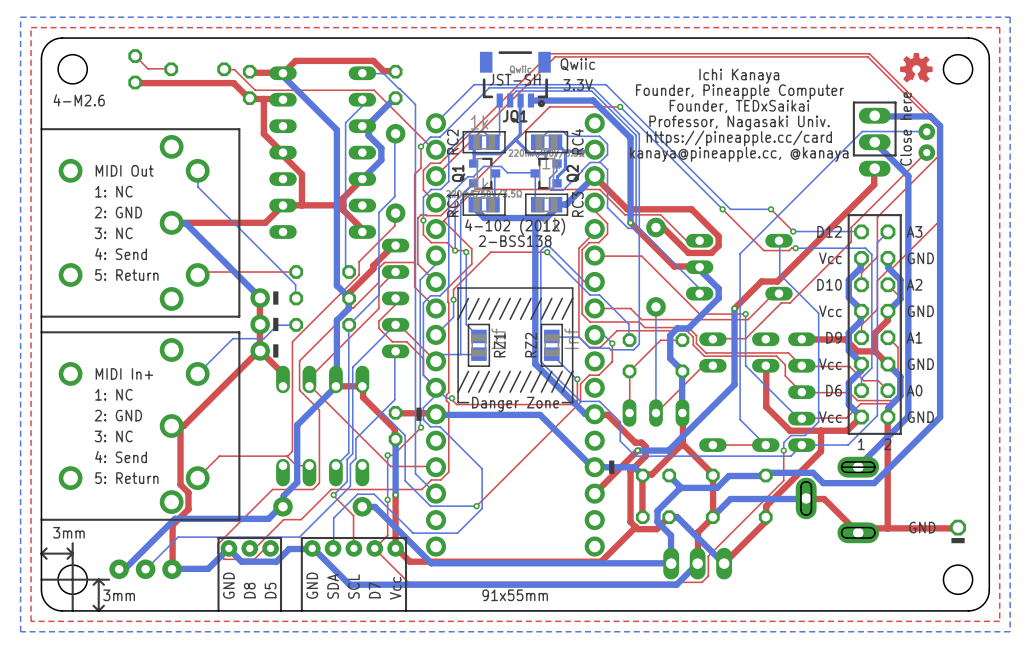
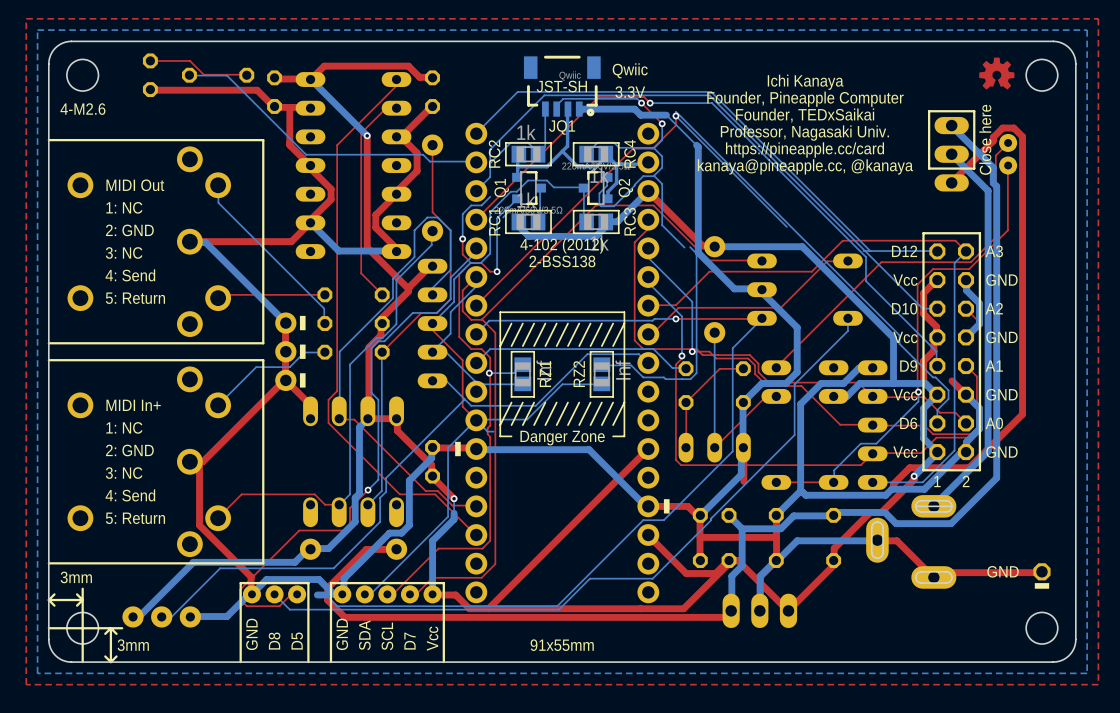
bottom zone outline: (1010, 17) (20, 17) (20, 631) (1010, 631) (1010, 17) -> (1087, 30) (1087, 673) (37, 673) (37, 30) (1087, 30)
top zone outline: (999, 27) (31, 27) (31, 621) (999, 621) (999, 27) -> (1098, 18) (1098, 684) (26, 684) (26, 18) (1098, 18)
top track: (135, 56) (147, 68) (171, 69) -> (150, 60) (190, 60) (203, 74) (246, 75)
bottom track: none -> (189, 75) (227, 75) (306, 154) (423, 154) (429, 161) (476, 162)
top track: (224, 69) (234, 69) (255, 90) (374, 90) (432, 148) (436, 149) -> none
bottom track: (283, 73) (283, 76) (336, 129) (336, 285) (349, 298) (348, 308) (336, 320) (335, 386) -> (311, 79) (367, 135)
bottom track: (362, 73) (383, 73) (415, 104) (415, 257) -> (490, 253) (480, 263) (470, 263) (454, 279)
bottom track: (605, 84) (730, 209) (771, 209) -> (660, 91) (711, 91) (870, 251)
bottom track: (498, 87) (489, 87) (440, 137) (430, 137) (421, 146) -> (544, 95) (490, 149) (490, 163)
bottom track: (593, 87) (611, 106) -> (634, 109) (640, 115) (666, 115)
bottom track: none -> (646, 95) (709, 95) (922, 308) (937, 308)
bottom track: (584, 91) (591, 91) (636, 135) (636, 225) (632, 228) (628, 228) -> (637, 98) (641, 103)
top track: none -> (641, 103) (662, 123)
via: none -> (641, 103)
bottom track: none -> (650, 103) (712, 103) (866, 257) (866, 281) (936, 351) (937, 366)
via: none -> (650, 103)
top track: none -> (432, 106) (401, 136) (396, 136) (403, 139) (417, 152) (417, 171) (397, 190) (396, 194)
bottom track: (395, 98) (367, 125) (362, 126) (368, 128) (368, 135) (381, 148) (381, 160) (362, 179) -> none
top track: none -> (396, 108) (386, 108) (361, 133) (361, 273) (382, 294)
bottom track: (362, 99) (362, 106) (345, 122) (345, 268) (349, 271) -> none
bottom track: (582, 100) (593, 100) (630, 137) (630, 222) -> none
top track: (620, 106) (549, 106) (440, 215) (421, 214) (417, 218) (417, 264) (436, 281) -> (675, 111) (675, 125) (652, 148) (632, 148) (476, 305)
bottom track: none -> (662, 123) (662, 140) (654, 148)
via: none -> (662, 123)
bottom track: (875, 116) (930, 116) (940, 125) (940, 417) (916, 441) -> (952, 126) (993, 167) (993, 183) (996, 186) (996, 478)
top track: none -> (367, 135) (367, 247) (408, 289)
via: none -> (367, 135)
bottom track: (926, 131) (862, 131) (740, 253) (740, 419) (765, 445) -> (918, 392) (918, 401) (876, 443) (860, 443) (834, 470) (833, 482)
top track: none -> (432, 145) (432, 212) (450, 230) (450, 299) (436, 312) (421, 312) (382, 352)
bottom track: (395, 133) (394, 196) (390, 200) -> (432, 294) (432, 288) (450, 269) (450, 230) (437, 217) (427, 217)
bottom track: (639, 133) (639, 228) (699, 288) (699, 293) -> (696, 145) (698, 146) (698, 252) (734, 288) (761, 288) (763, 294)
top track: (421, 146) (421, 168) (414, 174) (414, 287) (436, 308) -> none
via: (421, 146) -> none
top track: (926, 152) (851, 227) (851, 241) (790, 302) (781, 302) (745, 338) (713, 338) -> (1008, 142) (995, 155) (995, 237) (970, 262) (881, 262) (776, 367)
top track: none -> (1008, 165) (1007, 230) (969, 269) (933, 269) (917, 284) (918, 392)
bottom track: (448, 163) (448, 181) -> (490, 177) (476, 190)
top track: (874, 168) (874, 184) (777, 281) (761, 281) (734, 308) -> (951, 182) (993, 140) (993, 137) (1002, 128) (1013, 128) (1022, 136) (1022, 414) (969, 467) (909, 467) (893, 484)
top track: (436, 175) (555, 56) (867, 56) (937, 126) (937, 156) (877, 217) (877, 256) (861, 272) (861, 284) -> none
top track: (301, 183) (301, 205) -> (331, 199) (311, 219) (311, 222)
top track: (546, 189) (474, 189) (436, 229) -> (595, 205) (515, 286)
bottom track: (460, 200) (460, 354) -> none
top track: (436, 202) (423, 190) (423, 170) (430, 163) (440, 163) (549, 53) (869, 53) (940, 125) (940, 219) (877, 280) (877, 309) (861, 325) (861, 337) -> (476, 219) (598, 97) (644, 97) (650, 103)
top track: (594, 202) (594, 210) (607, 223) (607, 233) (598, 242) (589, 242) (582, 249) -> (648, 219) (647, 229) (634, 242) (634, 270)
bottom track: none -> (310, 222) (338, 251) (396, 251)
top track: (343, 205) (283, 205) -> none
top track: (627, 209) (691, 209) (718, 236) (718, 245) (711, 252) (688, 252) (663, 227) (655, 227) -> (683, 226) (702, 245) (714, 246)
top track: (722, 209) (763, 250) (789, 250) (795, 248) -> none
via: (722, 209) -> none
top track: (771, 209) (793, 231) -> none
via: (771, 209) -> none
top track: (395, 213) (394, 225) (359, 261) (359, 275) (292, 341) (292, 451) (287, 456) -> none
bottom track: none -> (432, 231) (431, 245) (396, 280) (396, 324) (382, 337) (376, 337) (350, 364) (350, 494) (339, 504)
top track: (624, 214) (660, 214) (686, 240) -> (681, 232) (708, 260) (747, 260)
bottom track: (535, 218) (535, 364) (585, 414) (594, 414) -> none
top track: (443, 220) (471, 248) (471, 264) -> none
top track: (630, 222) (674, 266) (699, 267) -> none
via: (630, 222) -> none
bottom track: none -> (714, 246) (802, 246) (893, 337) (893, 383)
bottom track: none -> (476, 248) (475, 252) (450, 277) (450, 299) (436, 312) (412, 312) (384, 341) (378, 341) (371, 348) (371, 392) (378, 399) (378, 479) (368, 490)
top track: (594, 229) (594, 233) (578, 248) (578, 337) (589, 347) (600, 347) (617, 330) (657, 330) -> (692, 351) (709, 351) (716, 358)
bottom track: none -> (648, 248) (648, 257) (692, 301) (692, 351)
via: (793, 231) -> none
top track: none -> (966, 251) (955, 240) (842, 240) (811, 271) (709, 271) (675, 305) (648, 305)
bottom track: (448, 233) (448, 287) (440, 295) (430, 295) (423, 302) (423, 375) (439, 391) (423, 407) (423, 419) (430, 426) (440, 426) (482, 468) (482, 508) (457, 533) (413, 533) (374, 494) (357, 494) (333, 518) (333, 548) -> (601, 383) (562, 384) (527, 419) (476, 419) (448, 447) (448, 516) (370, 594) (365, 594)
bottom track: (378, 237) (378, 295) (349, 324) -> (414, 257) (393, 278) (393, 298) (339, 351) (339, 418)
bottom track: (779, 240) (779, 274) (818, 313) (818, 422) (805, 435) (790, 435) (783, 442) (783, 450) -> none
top track: (440, 242) (447, 242) (455, 250) (466, 252) -> (481, 263) (490, 271) (492, 271)
bottom track: (795, 248) (865, 248) (871, 254) (871, 360) -> (675, 111) (899, 335) (899, 343) (948, 390)
via: (795, 248) -> none
bottom track: (466, 252) (466, 324) (478, 336) -> (489, 373) (514, 373) (522, 364)
via: (466, 252) -> none
top track: (547, 252) (490, 252) (453, 289) (453, 299) -> none
bottom track: (547, 252) (590, 295) (599, 295) (628, 324) (628, 339) -> (490, 349) (653, 349) (672, 367) (685, 367)
via: (547, 252) -> none
top track: none -> (476, 277) (462, 290) (462, 311) (471, 319) (481, 319) (489, 312)
top track: (594, 255) (641, 256) (699, 314) (745, 314) -> none
bottom track: none -> (648, 277) (648, 282) (681, 316) (681, 355)
top track: none -> (937, 280) (923, 293) (923, 313) (936, 326) (937, 337) (933, 339) (933, 350) (923, 361) (923, 381) (937, 394)
bottom track: (861, 258) (860, 268) (848, 279) (848, 297) (861, 311) (860, 321) (848, 333) (848, 350) (861, 364) (860, 371) (848, 383) -> (833, 396) (847, 396) (859, 383) (925, 383) (937, 394) (923, 408) (923, 415)
top track: (414, 262) (384, 262) (378, 268) (378, 282) (299, 360) (299, 368) -> (396, 79) (396, 85) (337, 145) (337, 391) (328, 399)
top track: (395, 271) (378, 287) (378, 308) (309, 377) (309, 386) (390, 466) (413, 466) -> (339, 418) (354, 419) (425, 490) (437, 490) (452, 505)
bottom track: (415, 278) (415, 460) -> (454, 301) (432, 323)
bottom track: (420, 279) (421, 427) -> (459, 303) (450, 312) (450, 333) (432, 352) (439, 345) (480, 386) (476, 391)
bottom track: (594, 281) (584, 281) (549, 246) (544, 246) (540, 250) (540, 361) (580, 401) (599, 401) (620, 422) (620, 441) (635, 456) (790, 456) (801, 445) -> none
top track: (448, 287) (448, 329) -> (471, 263) (459, 274) (459, 337) (471, 349) (481, 349) (490, 357)
bottom track: (718, 288) (718, 298) (688, 328) (677, 328) (670, 335) (670, 358) (682, 371) -> (782, 312) (797, 327) (797, 372) (786, 383) (761, 383) (743, 402)
top track: none -> (761, 318) (675, 318)
top track: (779, 293) (773, 294) (748, 319) (641, 319) (630, 308) (594, 308) -> (847, 260) (827, 261) (780, 307) (678, 307) (652, 333) (648, 334)
bottom track: none -> (847, 318) (847, 331) (794, 384) (794, 435) (652, 578) (589, 578) (558, 609) (289, 609) (274, 594)
bottom track: none -> (675, 318) (654, 318) (652, 320) (489, 320) (476, 334)
via: none -> (675, 318)
top track: none -> (382, 323) (380, 335) (368, 347) (367, 418)
top track: (395, 298) (394, 305) (378, 321) (378, 328) (392, 341) (406, 341) (423, 358) -> (432, 323) (432, 330) (462, 360) (462, 388)
bottom track: (453, 299) (453, 317) (448, 322) -> none
via: (453, 299) -> none
bottom track: (734, 308) (734, 384) (668, 450) (637, 450) -> none
via: (734, 308) -> none
top track: (887, 311) (887, 320) (875, 333) (875, 351) (857, 351) (845, 339) (801, 339) -> none
bottom track: (745, 314) (745, 365) (798, 418) (801, 418) -> none
via: (745, 314) -> none
top track: (395, 324) (399, 325) (436, 361) -> none
bottom track: (395, 324) (352, 367) (352, 441) -> (464, 399) (386, 478)
via: none -> (692, 351)
top track: none -> (681, 355) (675, 364) (675, 460) (681, 465) (860, 465) (872, 453)
via: none -> (681, 355)
bottom track: (594, 334) (604, 335) (612, 343) -> (648, 363) (638, 354) (587, 354) (535, 405) (471, 405) (446, 380) (432, 380)
bottom track: none -> (872, 367) (859, 367) (843, 383) (821, 383) (800, 404) (800, 490)
top track: (612, 343) (612, 361) (598, 375) (589, 375) (580, 383) (580, 402) (476, 506) -> none
via: (612, 343) -> none
via: none -> (489, 373)
bottom track: (395, 351) (394, 399) (355, 438) (355, 458) (350, 464) (350, 486) (299, 537) (178, 537) (146, 568) -> (365, 536) (333, 568) (220, 568) (172, 616) (162, 616)
bottom track: (551, 354) (577, 379) -> none
top track: (736, 356) (776, 356) (785, 364) (785, 375) (801, 391) -> (801, 386) (840, 424) (872, 424)
via: none -> (918, 392)
top track: (765, 365) (766, 406) (790, 430) (847, 430) (861, 417) -> none
top track: (577, 379) (577, 400) (573, 404) (456, 404) (451, 398) -> none
via: (577, 379) -> none
bottom track: (328, 394) (297, 425) (297, 482) (283, 495) (283, 506) -> (359, 427) (359, 493) (355, 497) (355, 521) (328, 548) (311, 548)
via: (451, 398) -> none
top track: (319, 410) (319, 468) -> (368, 490) (350, 508)
top track: none -> (350, 444) (399, 494) (435, 494) (476, 535)
bottom track: (382, 412) (405, 435) (405, 480) (430, 506) (476, 506) -> none
bottom track: none -> (432, 447) (431, 458) (409, 480) (409, 525) (401, 533) (389, 533) (343, 578) (342, 594) (333, 594) (319, 579) (266, 579) (251, 594)
top track: (594, 414) (607, 414) (635, 442) (641, 442) (645, 446) (645, 456) (630, 471) (630, 522) (637, 529) -> (648, 449) (488, 608)
bottom track: none -> (937, 452) (914, 476)
top track: (887, 417) (887, 528) -> none
bottom track: none -> (966, 452) (959, 453) (924, 489) (891, 489) (885, 495) (805, 495) (800, 490)
top track: (421, 427) (393, 455) (387, 455) -> none
via: (421, 427) -> none
top track: (821, 430) (821, 446) -> none
top track: none -> (432, 476) (454, 498)
bottom track: (395, 439) (395, 495) -> none
via: none -> (914, 476)
top track: (821, 449) (799, 472) -> (914, 476) (914, 479) (881, 512) (870, 512)
top track: (637, 450) (594, 493) -> (694, 573) (686, 573) (648, 535)
via: (637, 450) -> none
top track: (783, 450) (783, 480) (708, 556) (708, 576) (701, 582) (408, 582) (374, 548) -> none
via: (783, 450) -> none
via: none -> (368, 490)
bottom track: none -> (800, 490) (776, 515)
bottom track: (387, 455) (387, 499) -> none
via: (387, 455) -> none
via: none -> (454, 498)
bottom track: (594, 467) (634, 467) (642, 475) -> (743, 447) (741, 450) (741, 474) (700, 515)
top track: (448, 472) (440, 479) (431, 479) (421, 489) (331, 489) (301, 519) (283, 519) (255, 548) (250, 548) -> (490, 511) (490, 540) (482, 548) (438, 548) (393, 594) (387, 594)
bottom track: (415, 473) (436, 493) -> (454, 513) (454, 519) (432, 540) (432, 594)
top track: (712, 475) (682, 444) (651, 474) (642, 475) -> (648, 506) (687, 506) (696, 515) (700, 515)
bottom track: (681, 487) (657, 510) (657, 522) (671, 535) (671, 563) (431, 563) (374, 506) (362, 506) -> (742, 528) (742, 565) (731, 576) (731, 610)
top track: (188, 492) (188, 509) (172, 525) (172, 569) -> (208, 533) (251, 576) (251, 594)
top track: (333, 495) (353, 515) (353, 548) -> none
via: (333, 495) -> none
top track: (395, 495) (395, 548) -> none
via: (395, 495) -> none
top track: none -> (776, 537) (700, 537)
top track: (387, 499) (387, 535) (374, 548) -> (482, 319) (495, 332) (495, 564) (481, 577) (432, 577) (416, 594) (410, 594)
via: (387, 499) -> none
bottom track: (732, 499) (712, 517) -> (797, 540) (760, 576) (759, 610)
top track: none -> (396, 549) (366, 549) (327, 588) (327, 600) (344, 617) (724, 617) (731, 610)
via: (476, 506) -> none
bottom track: (669, 517) (677, 517) (724, 563) -> none
top track: (635, 527) (601, 561) -> (788, 610) (737, 560) (729, 560) (726, 565) (683, 608) (655, 608)
top track: (395, 548) (409, 561) (429, 561) -> (432, 594) (455, 595) (469, 608)
bottom track: (289, 549) (276, 561) (241, 561) (228, 548) (208, 568) (205, 568) -> (251, 594) (248, 595) (227, 616)
bottom track: (297, 549) (314, 549) (349, 584) (676, 584) (697, 563) -> (325, 595) (337, 606) (557, 606) (643, 520) (663, 520) (732, 451) (732, 348) (761, 318)

